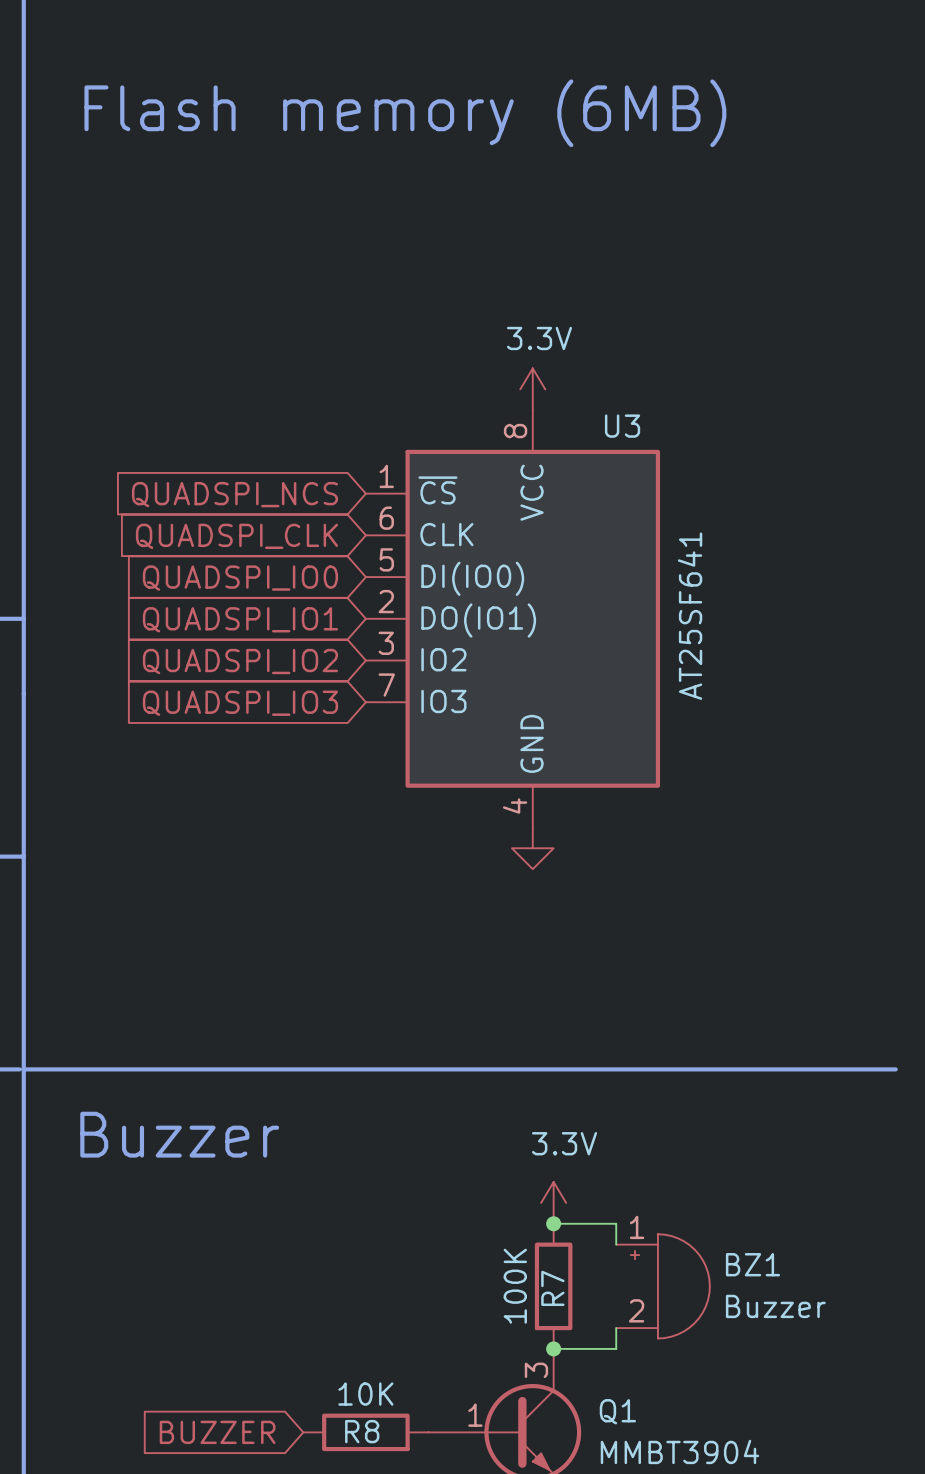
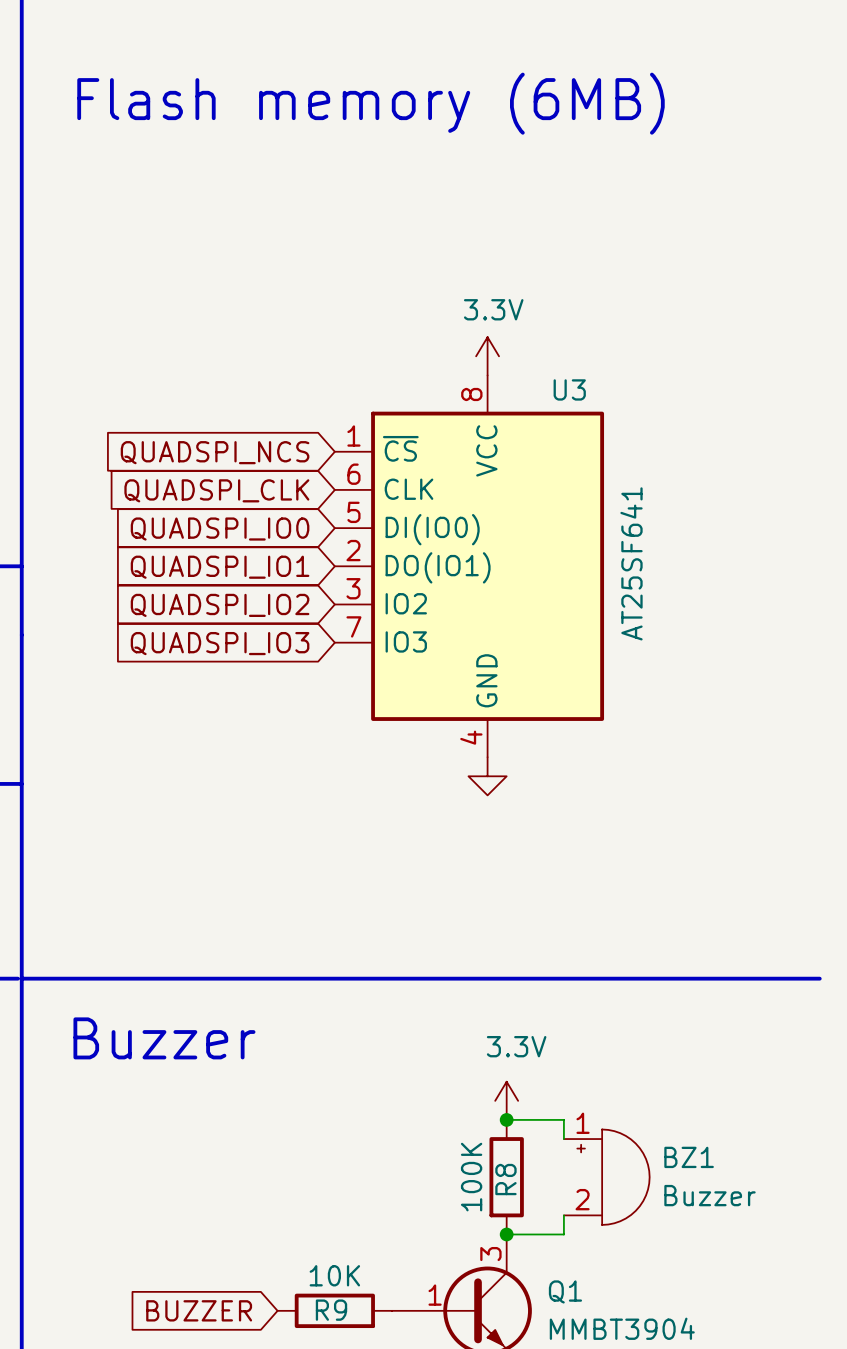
R7 name: R7 (552, 1288) -> R8 (505, 1179)
R8 name: R8 (362, 1431) -> R9 (331, 1310)

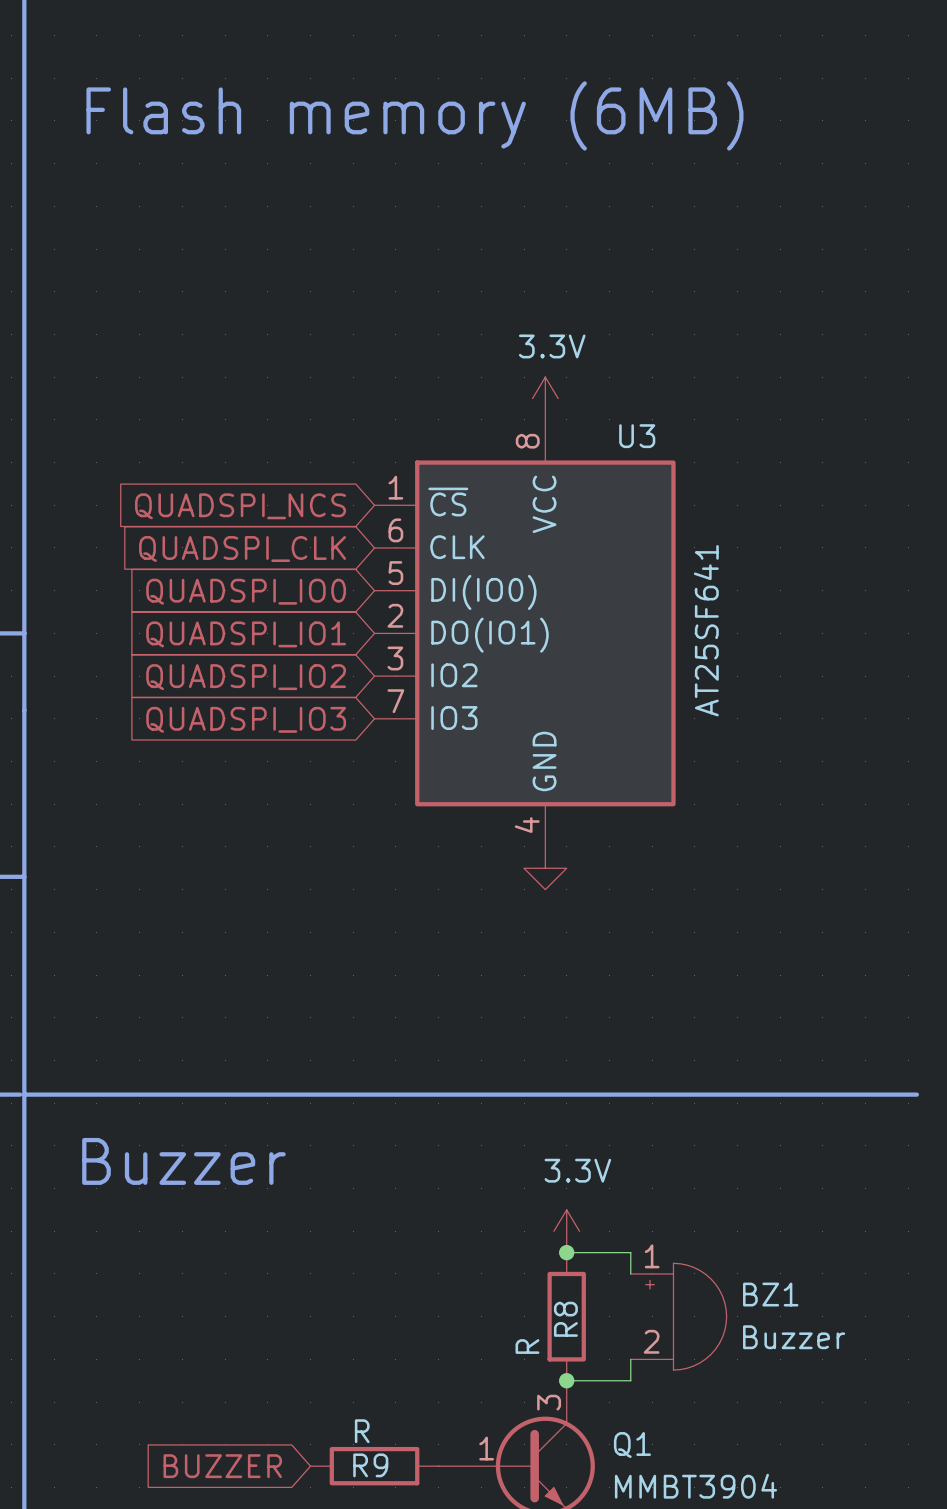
R8 value: 100K (471, 1177) -> R (527, 1346)
R9 value: 10K (334, 1275) -> R (362, 1431)

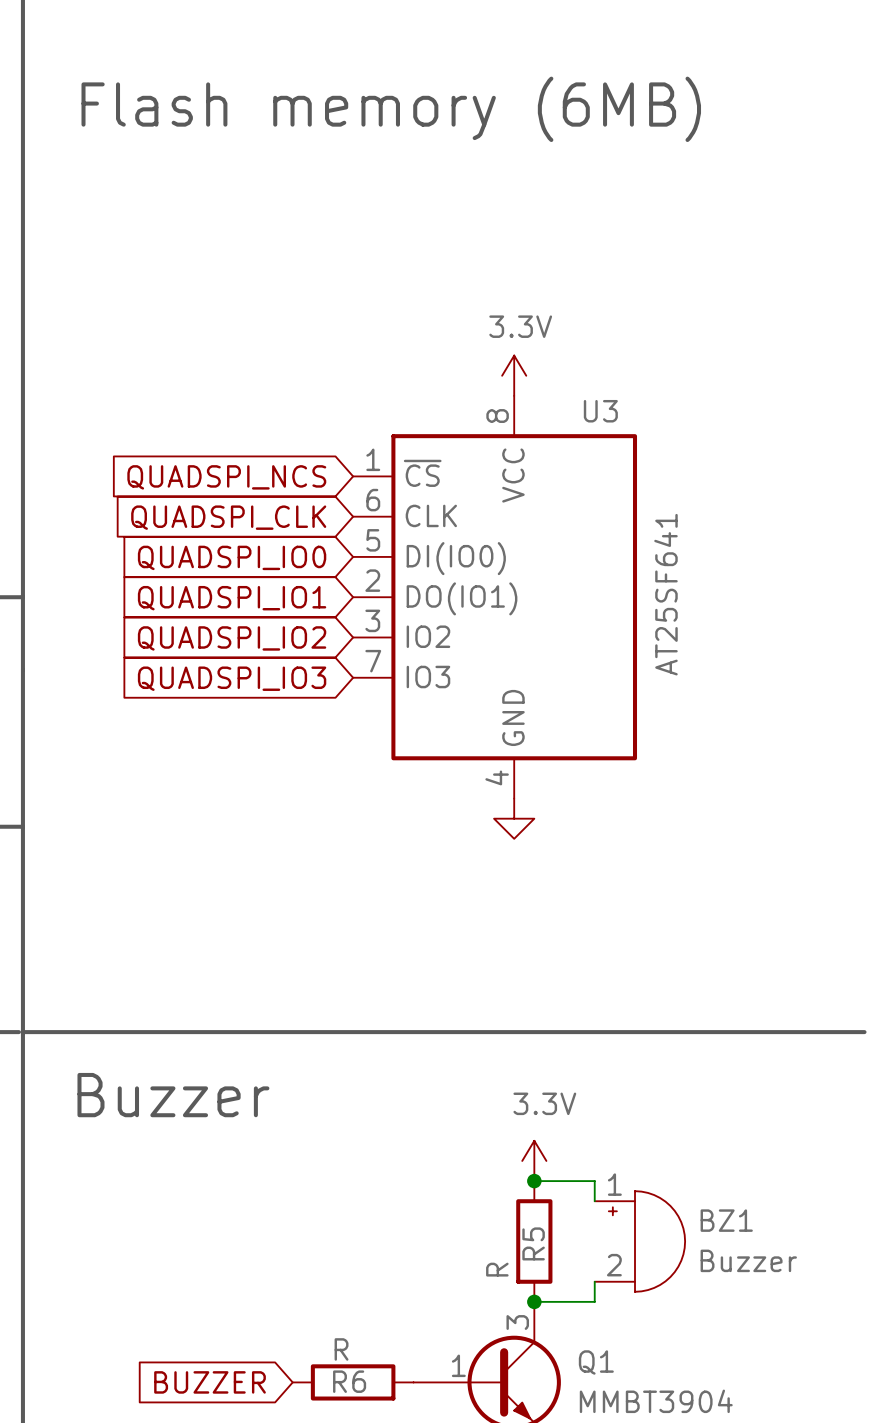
R8 name: R8 (565, 1319) -> R5 (533, 1243)
R9 name: R9 (370, 1465) -> R6 (349, 1381)

